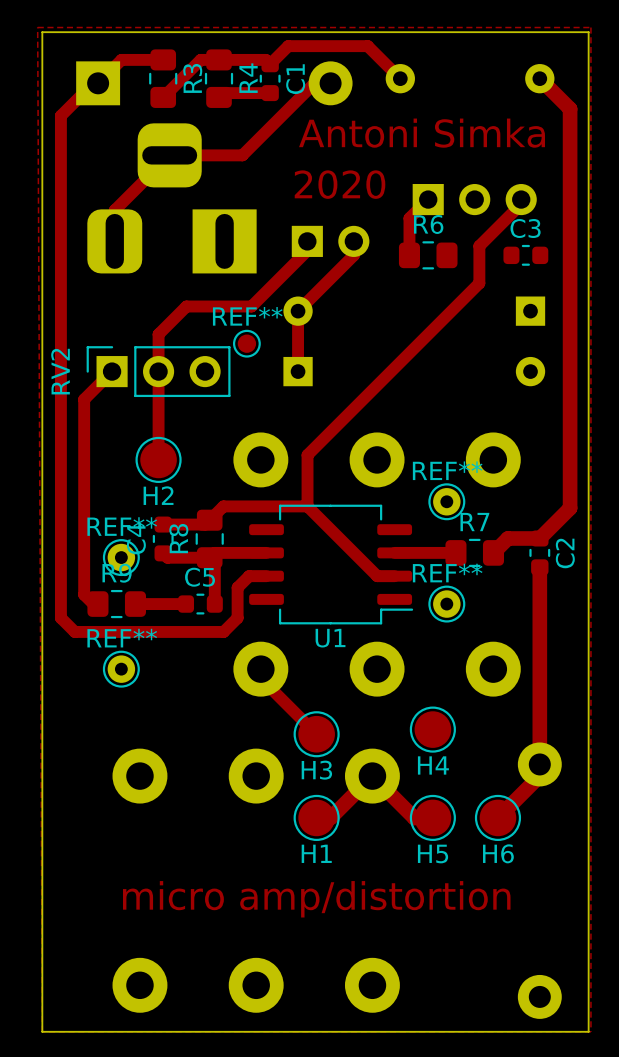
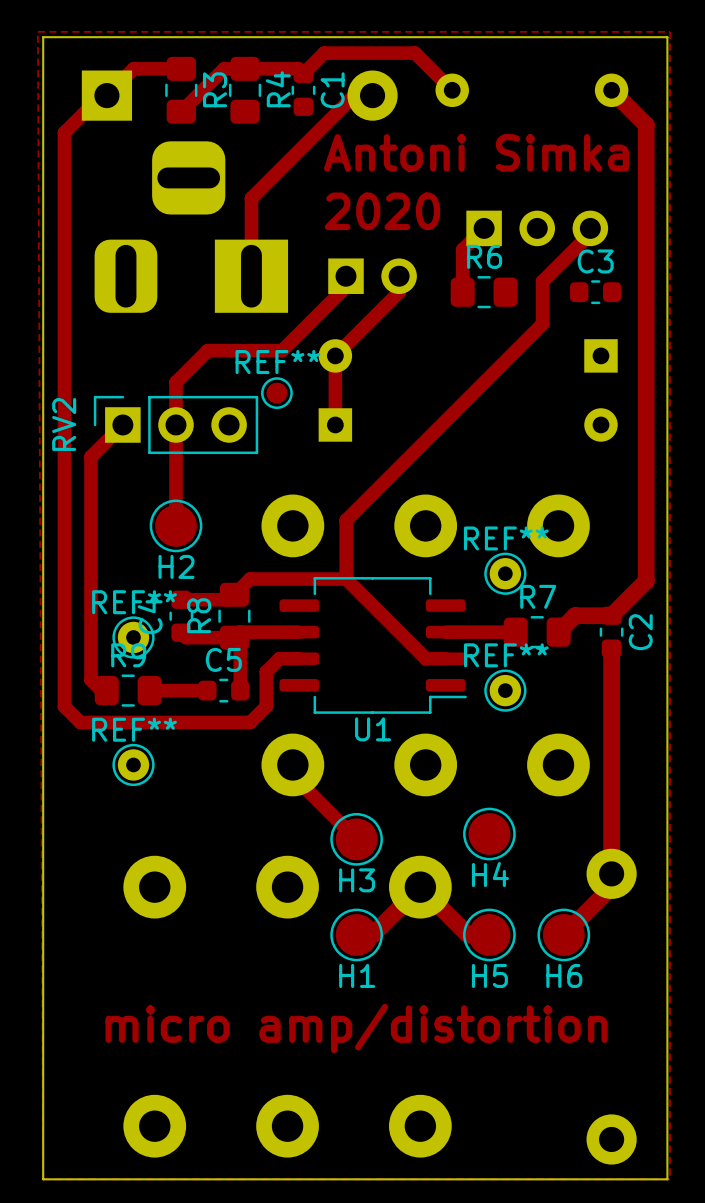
top track: (270, 93) (223, 93) (219, 97) -> none
top track: (242, 155) (169, 155) (114, 210) (114, 241) -> (271, 177) (251, 198) (251, 276)

